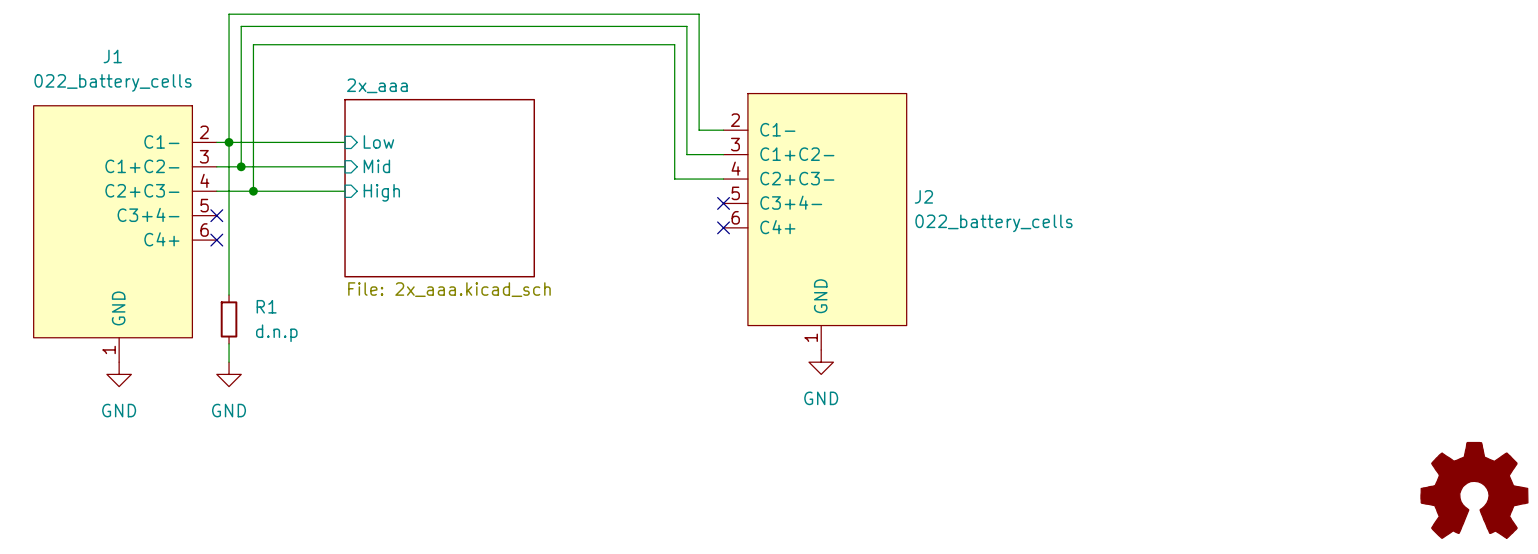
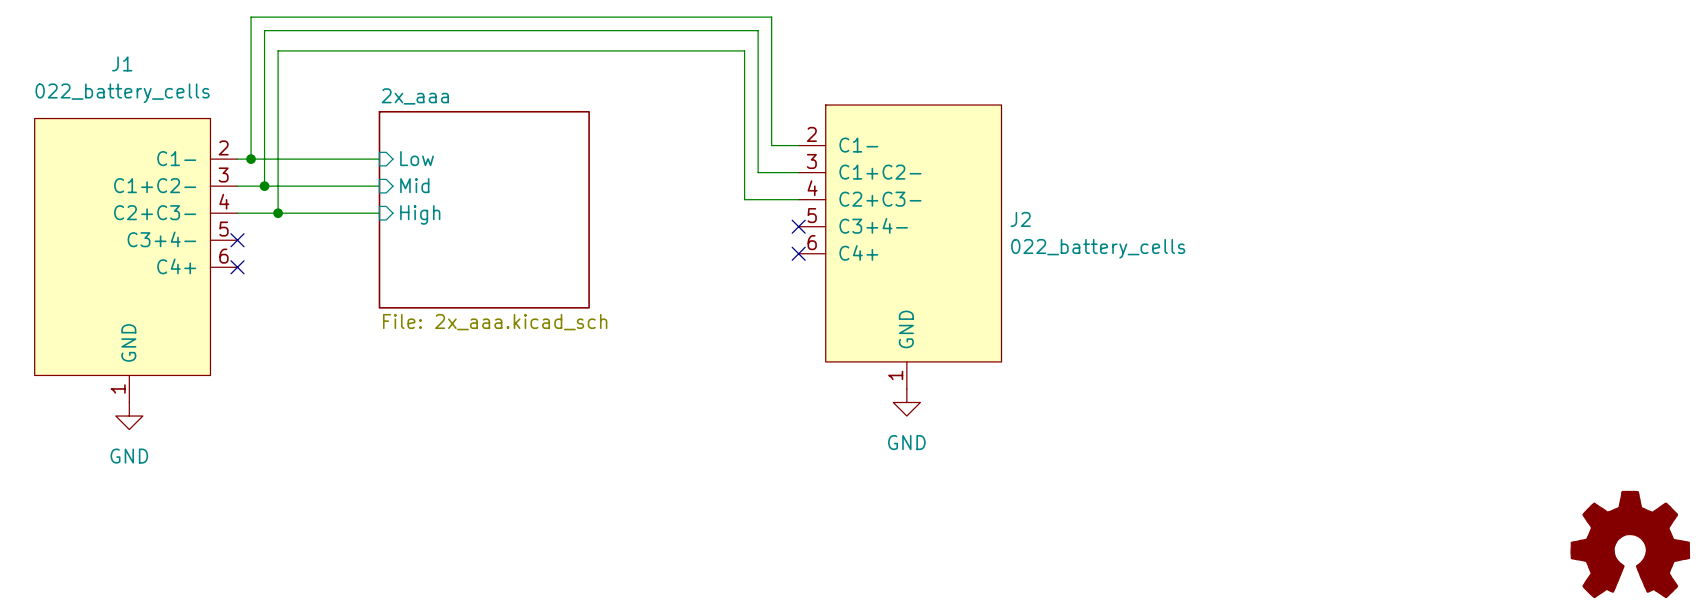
wire: (229, 142) (229, 295) -> none
R1: d.n.p (229, 319) -> none
wire: (229, 343) (229, 362) -> none
power symbol: GND (229, 374) -> none

